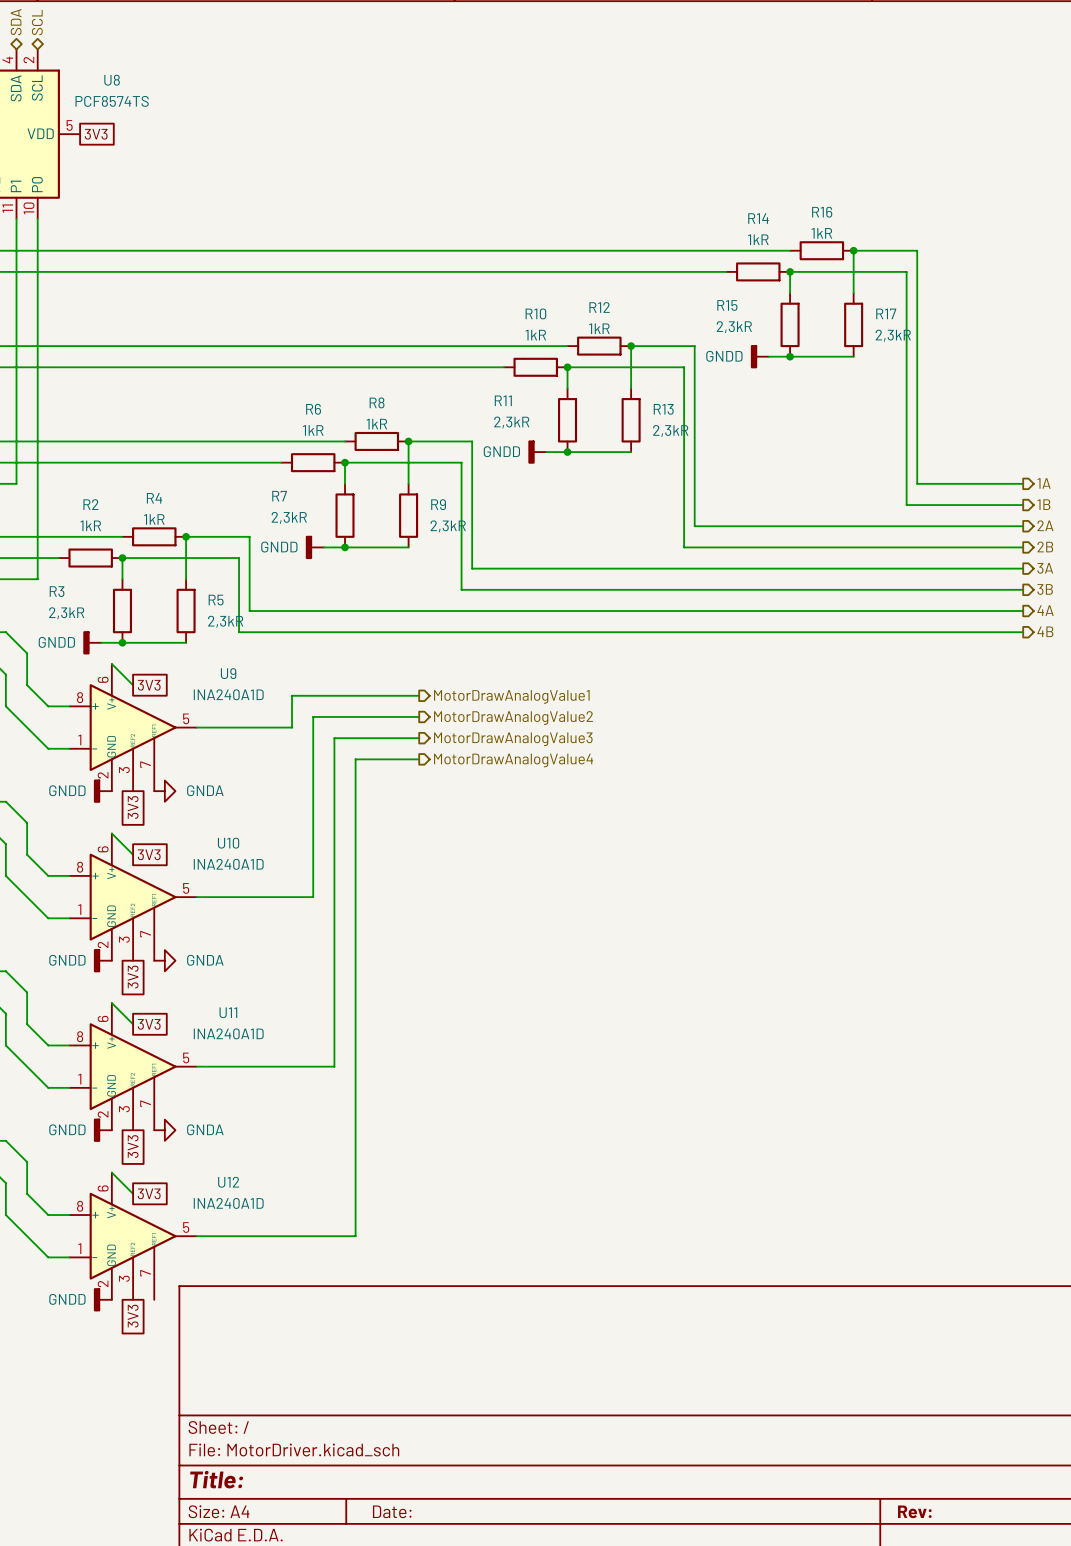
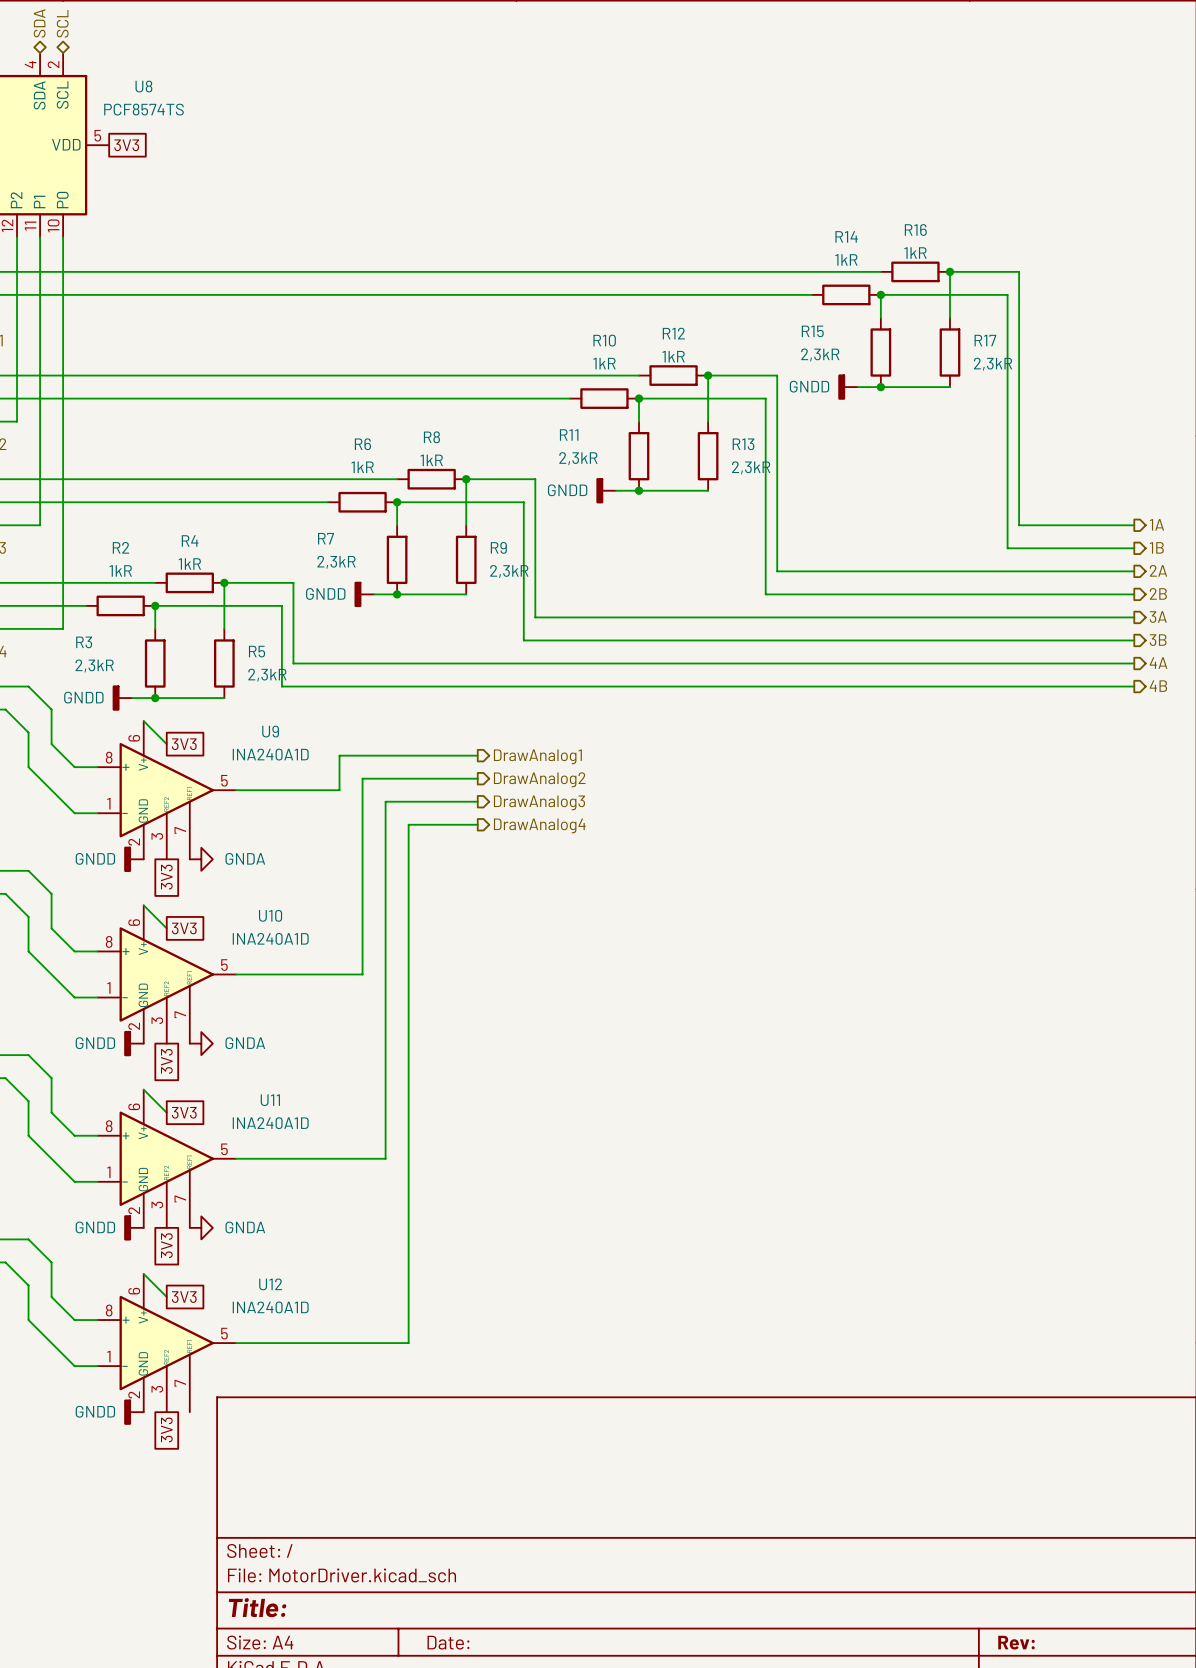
hierarchical label: MotorDrawAnalogValue1 (511, 696) -> DrawAnalog1 (537, 756)
hierarchical label: MotorDrawAnalogValue2 (513, 718) -> DrawAnalog2 (539, 779)
hierarchical label: MotorDrawAnalogValue3 (513, 739) -> DrawAnalog3 (539, 802)
hierarchical label: MotorDrawAnalogValue4 (513, 760) -> DrawAnalog4 (539, 825)

